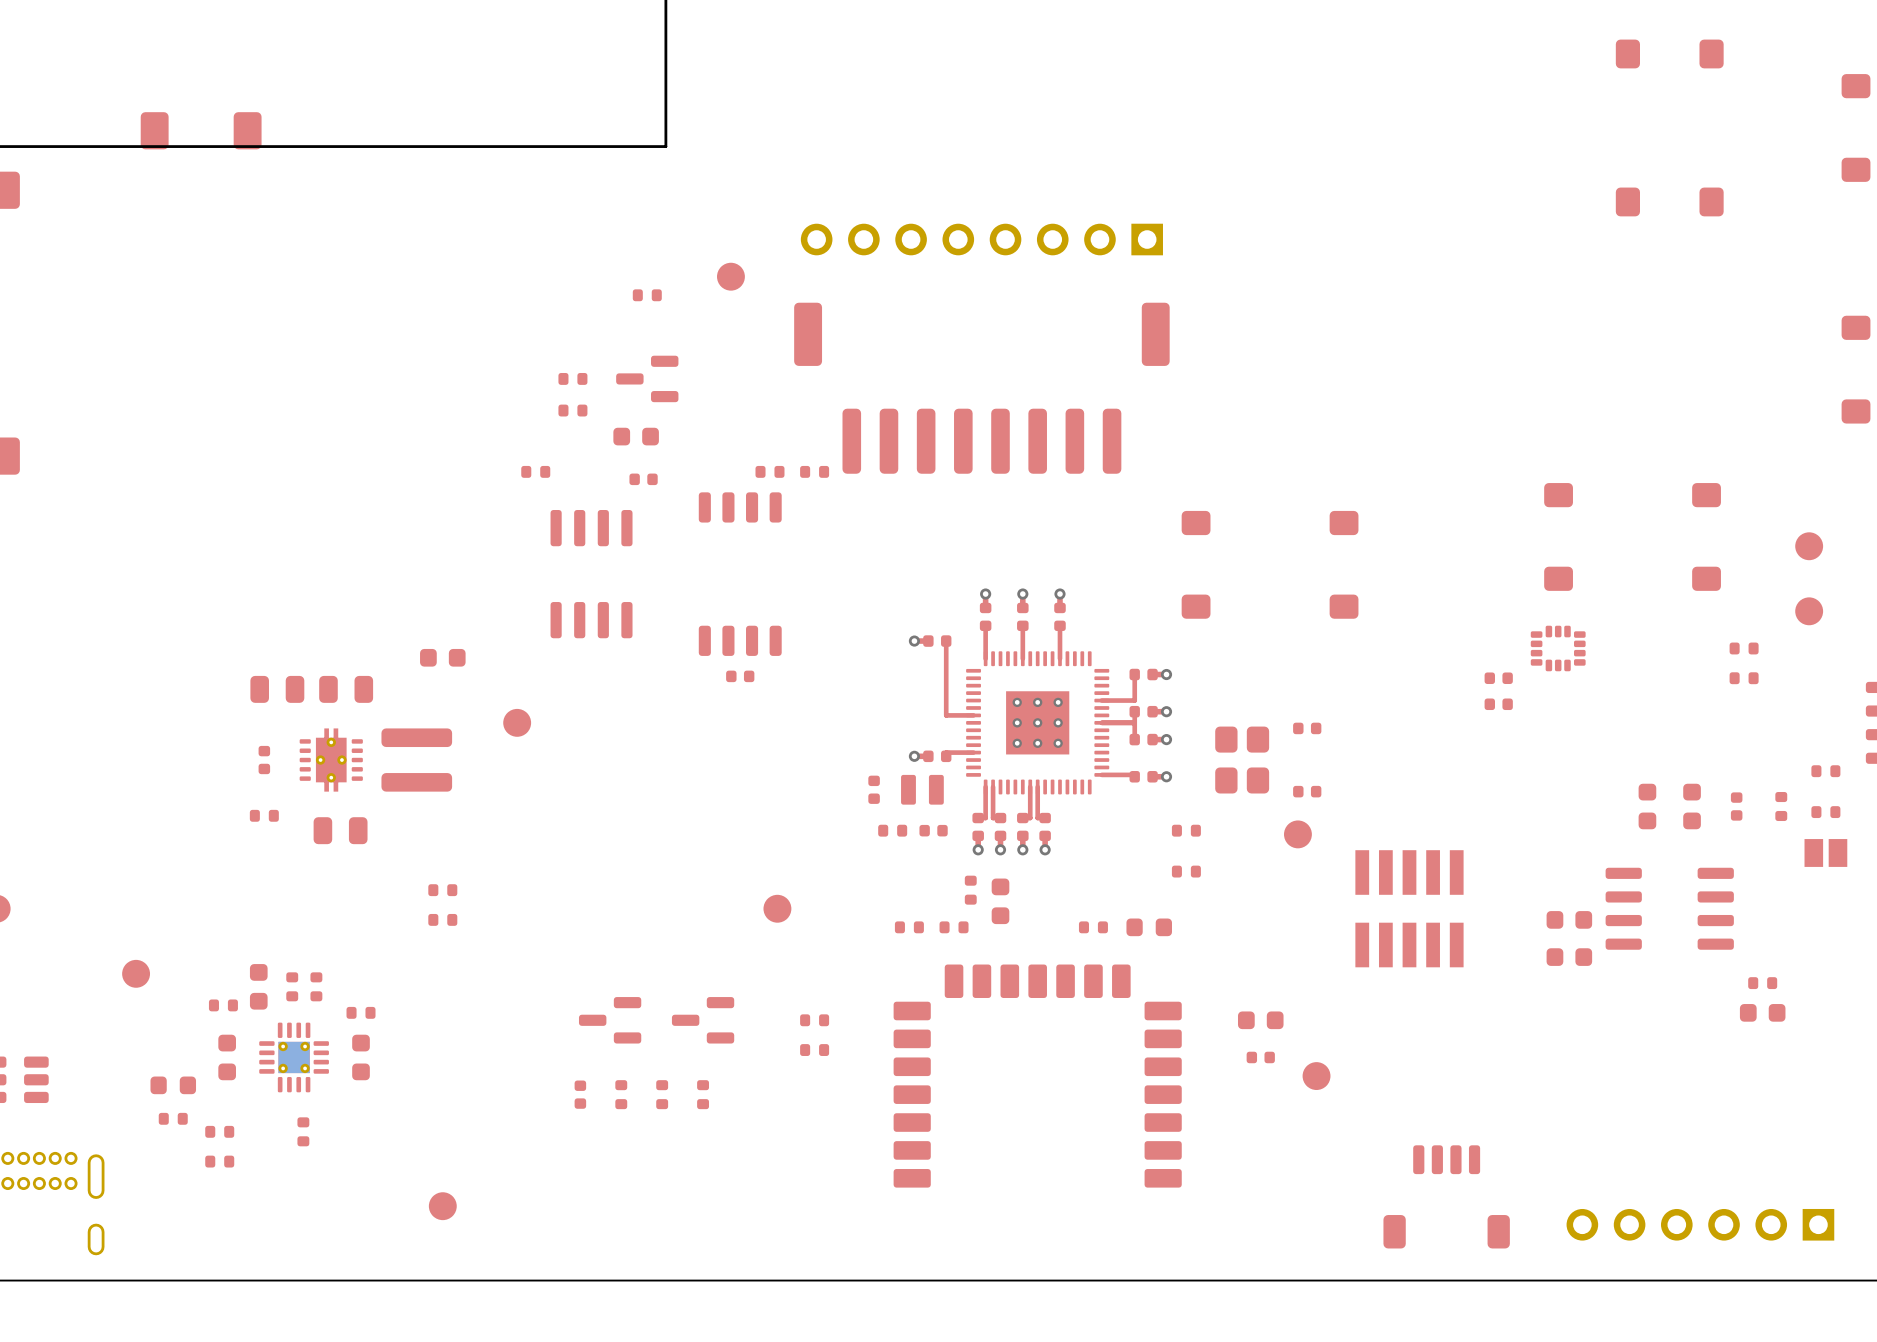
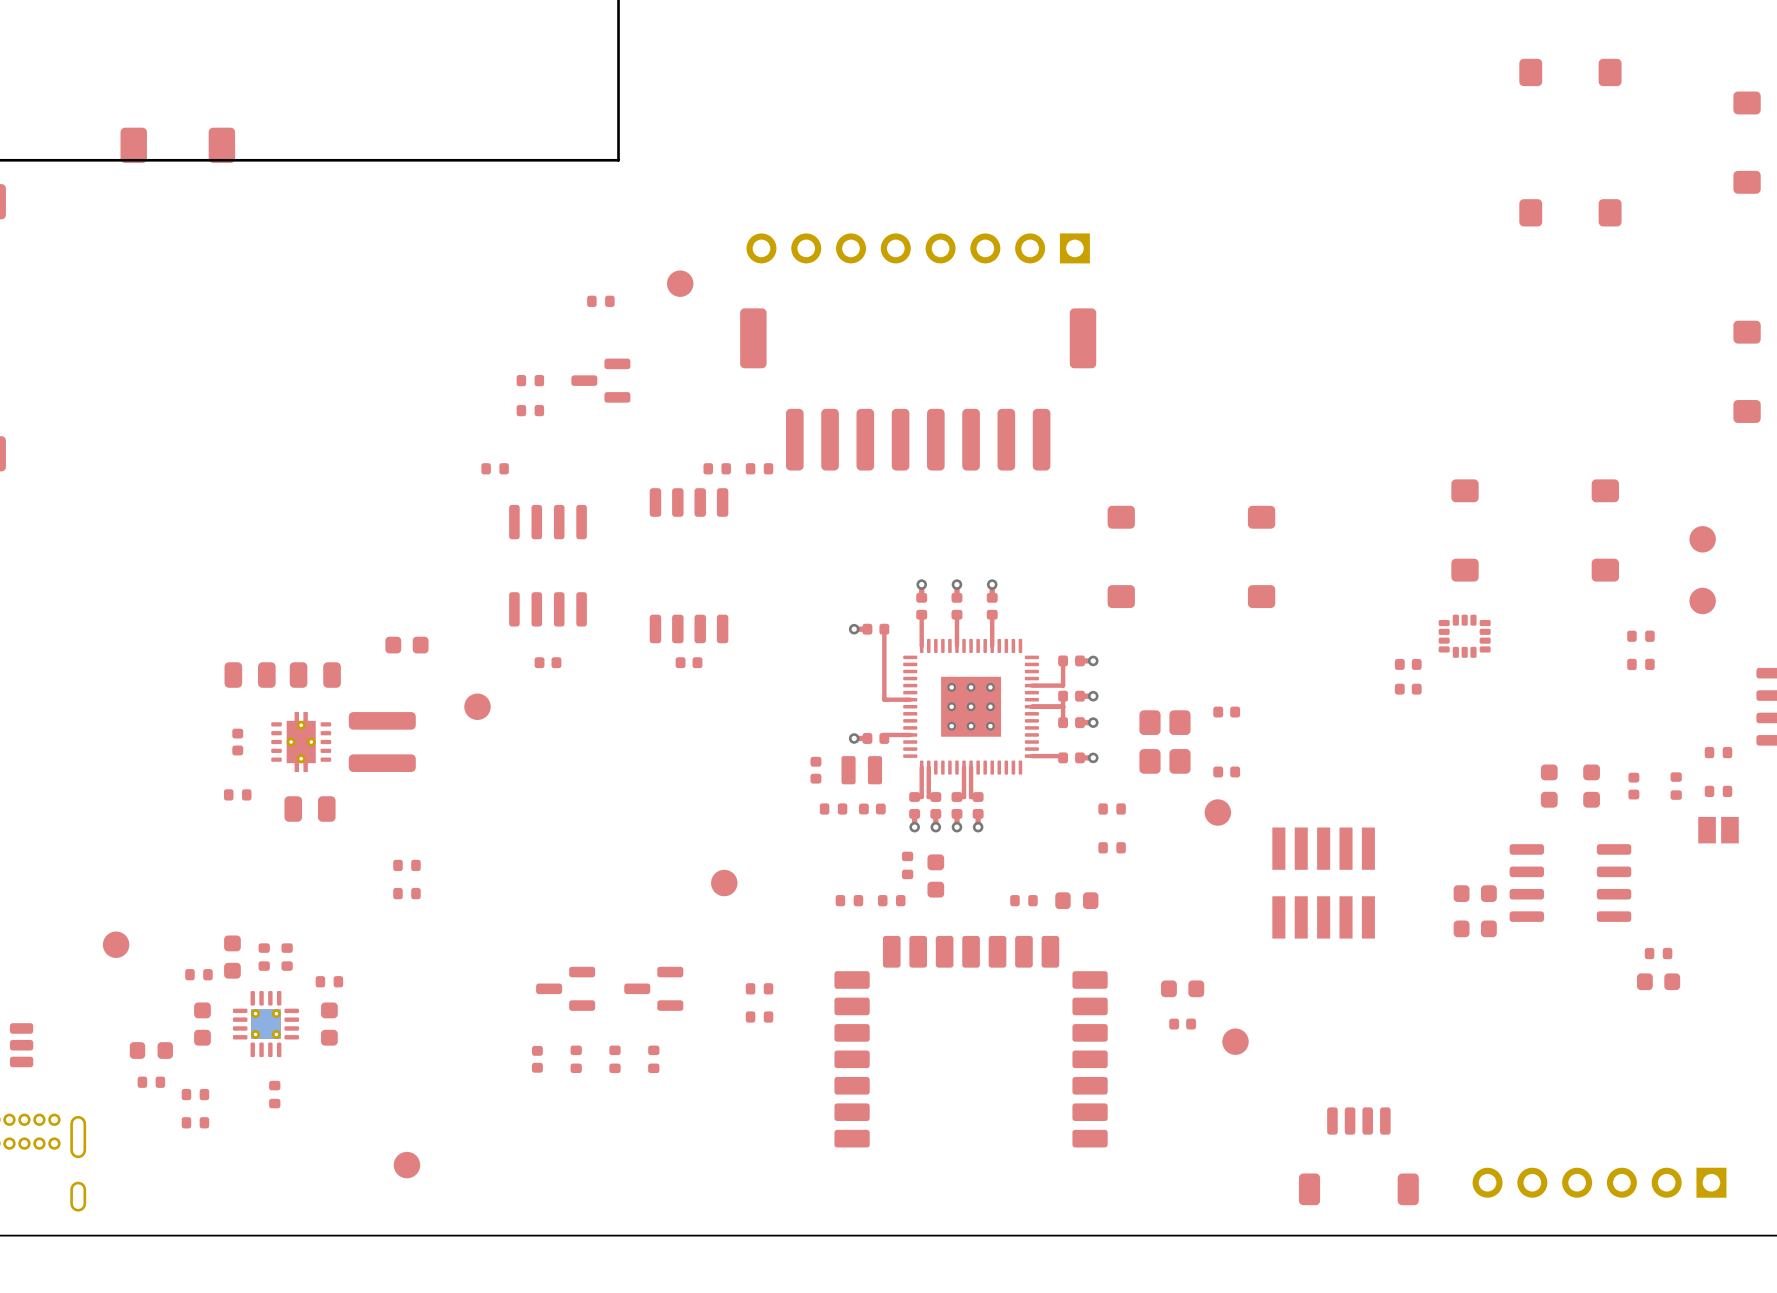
part: (636, 436) -> none
part position: (643, 479) -> (547, 662)

